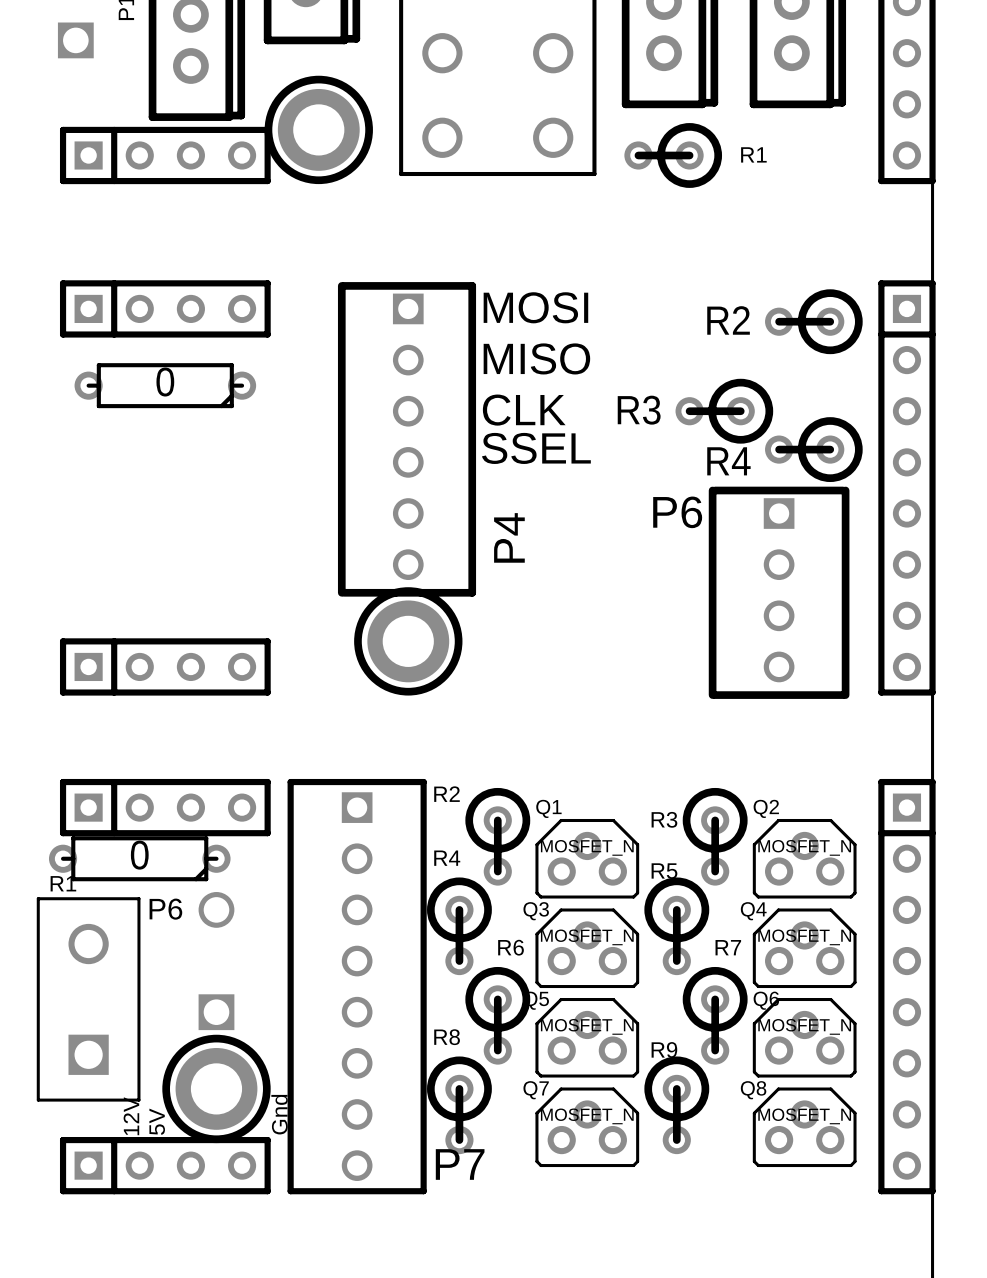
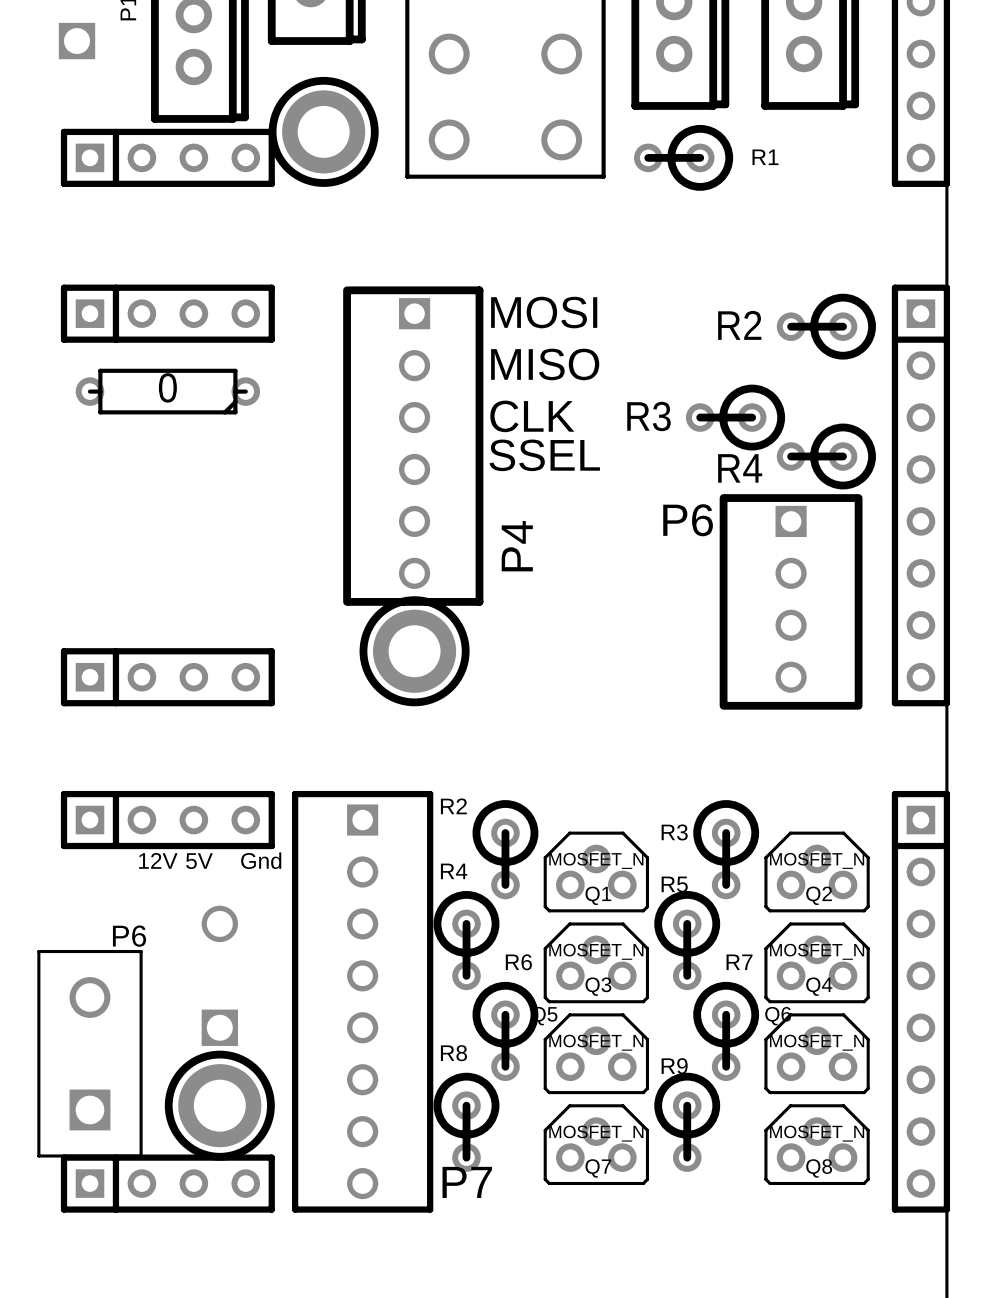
Q1 name position: Q1 (548, 808) -> Q1 (598, 895)
Q2 name position: Q2 (766, 808) -> Q2 (819, 895)
R1: 0 (139, 858) -> none
P6 name position: P6 (165, 909) -> P6 (129, 936)
Q3 name position: Q3 (536, 911) -> Q3 (598, 986)
Q4 name position: Q4 (753, 911) -> Q4 (819, 986)
P6 position: (88, 999) -> (89, 1053)
Q7 name position: Q7 (536, 1090) -> Q7 (598, 1168)
Q8 name position: Q8 (753, 1090) -> Q8 (819, 1168)
text rotation: 0° (279, 1114) -> 90° clockwise (261, 860)
text position: Gnd (279, 1114) -> Gnd (261, 860)
text rotation: 0° (131, 1116) -> 90° clockwise (158, 860)
text position: 12V (131, 1116) -> 12V (158, 860)
text rotation: 0° (157, 1121) -> 90° clockwise (199, 861)
text position: 5V (157, 1121) -> 5V (199, 861)

